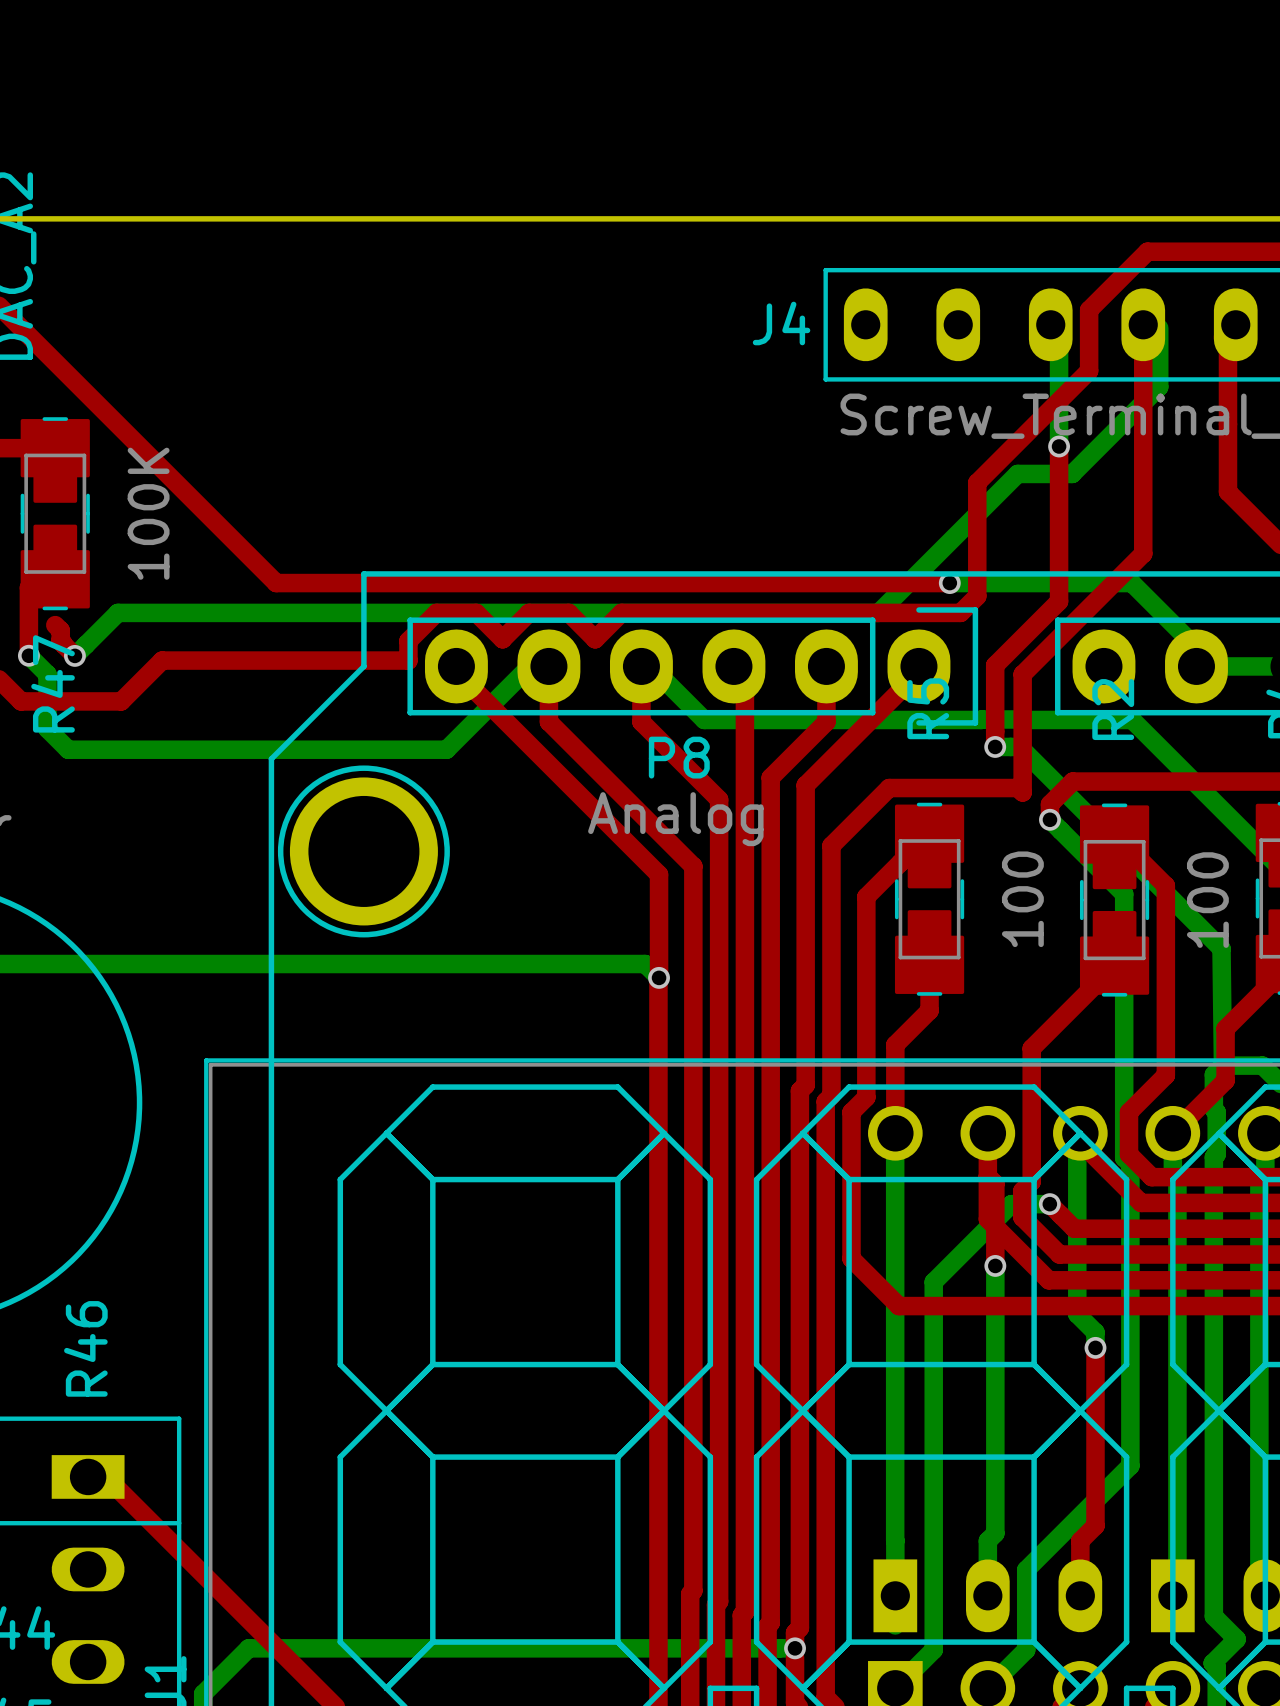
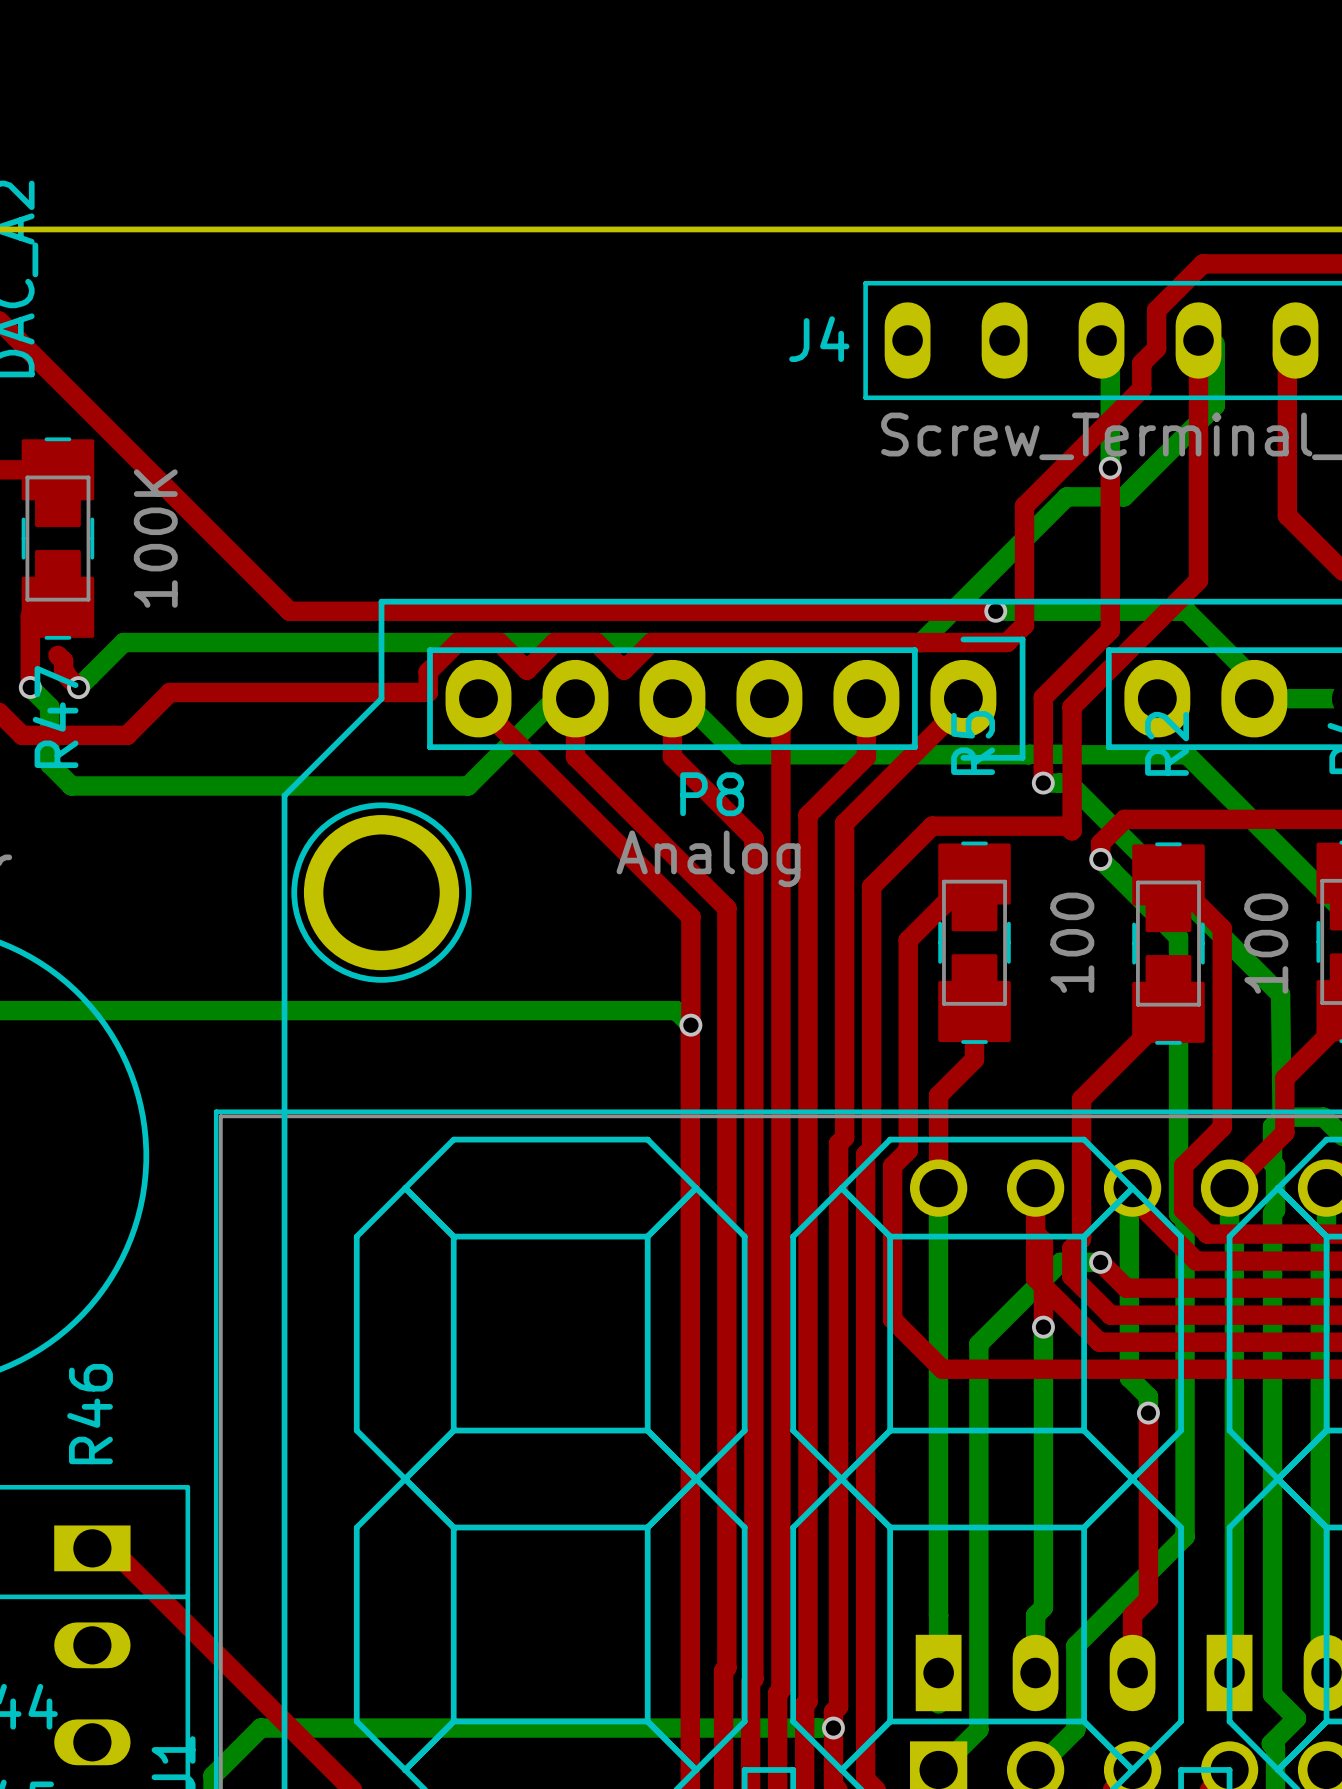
top track: (1103, 295) (1089, 310) (1089, 346) -> (1156, 310) (1156, 348) (1141, 363)

